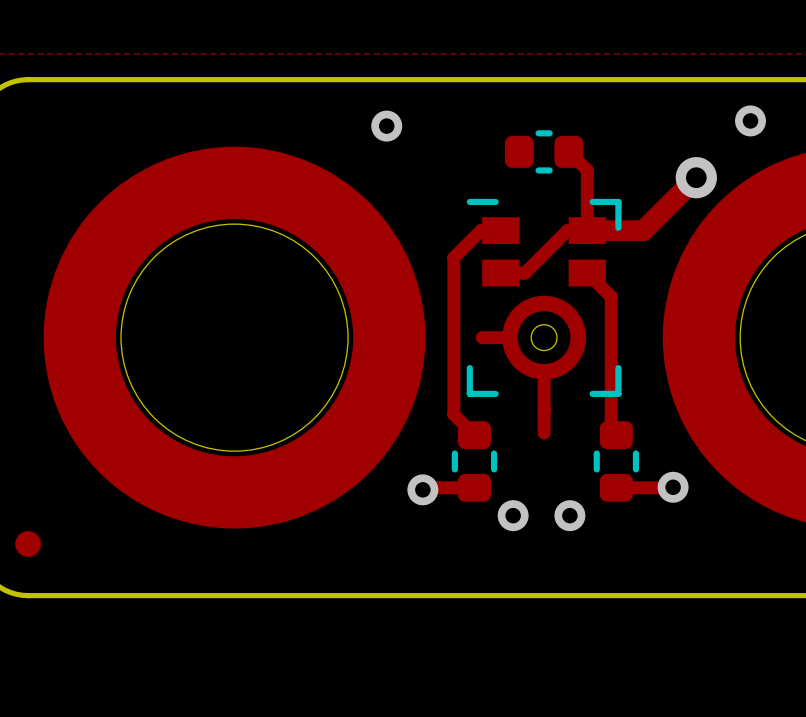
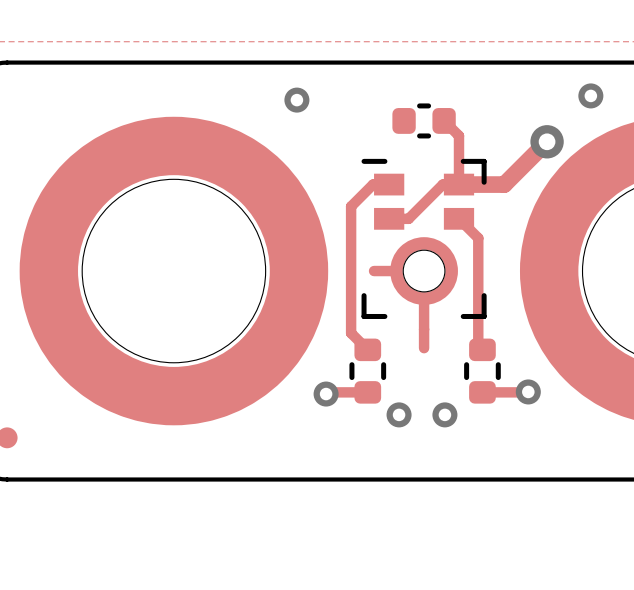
part footprint: [466, 198, 622, 397] -> [361, 158, 487, 319]

